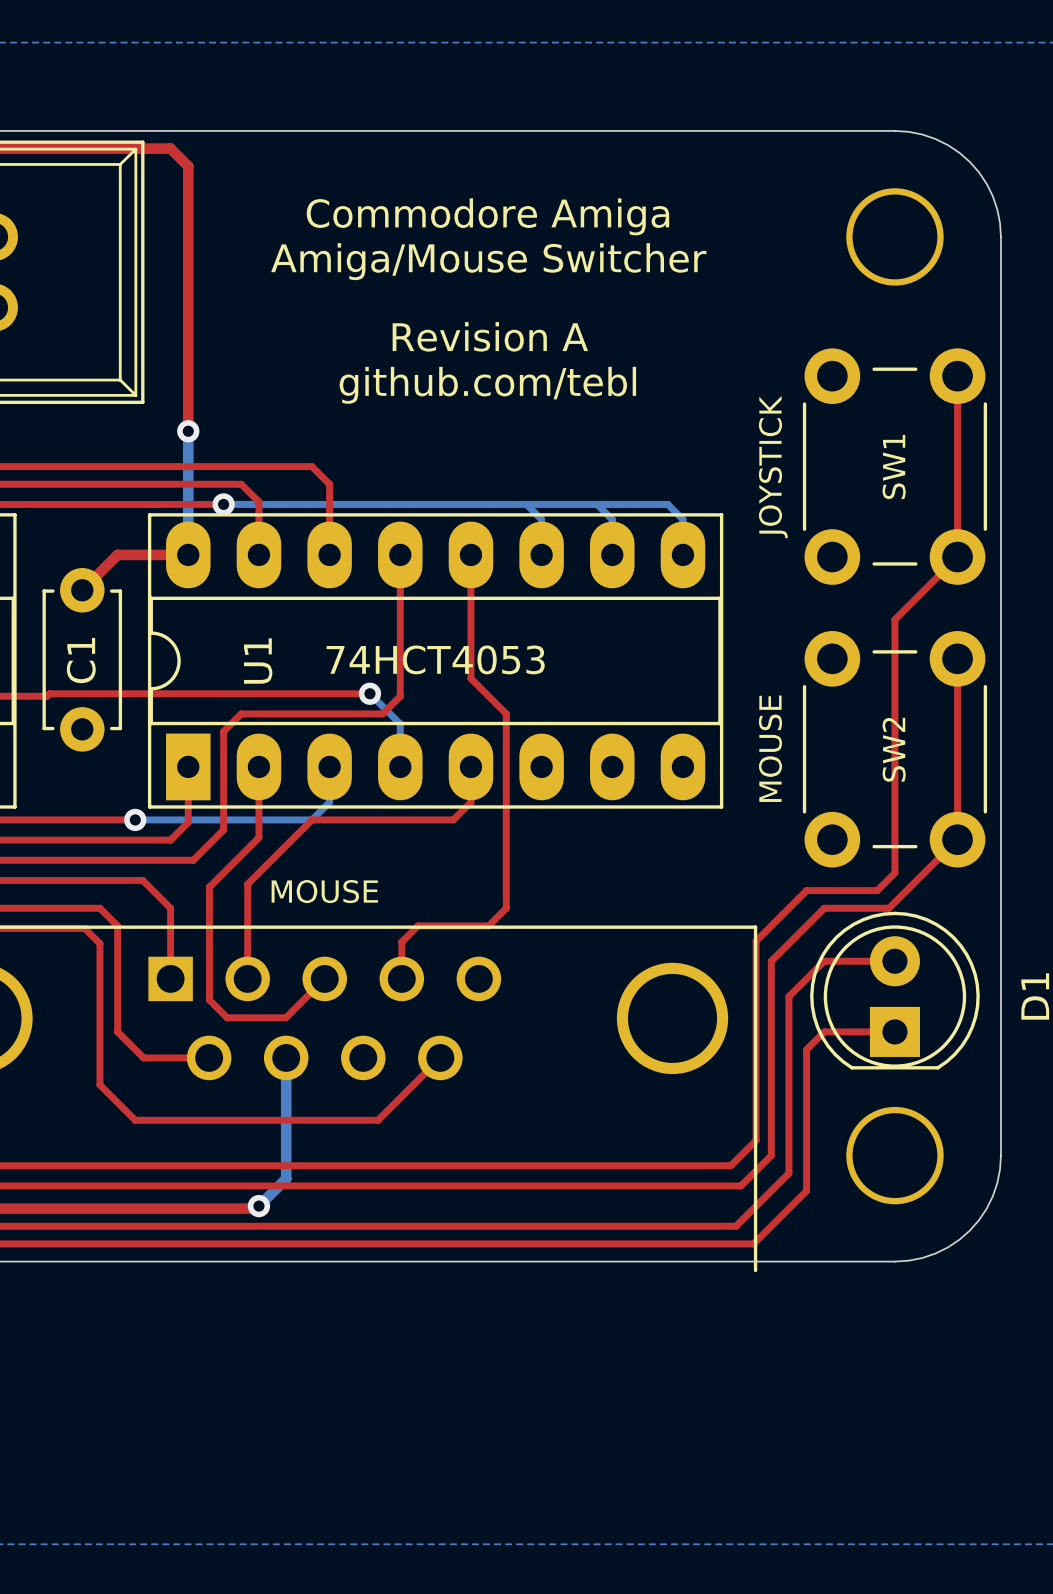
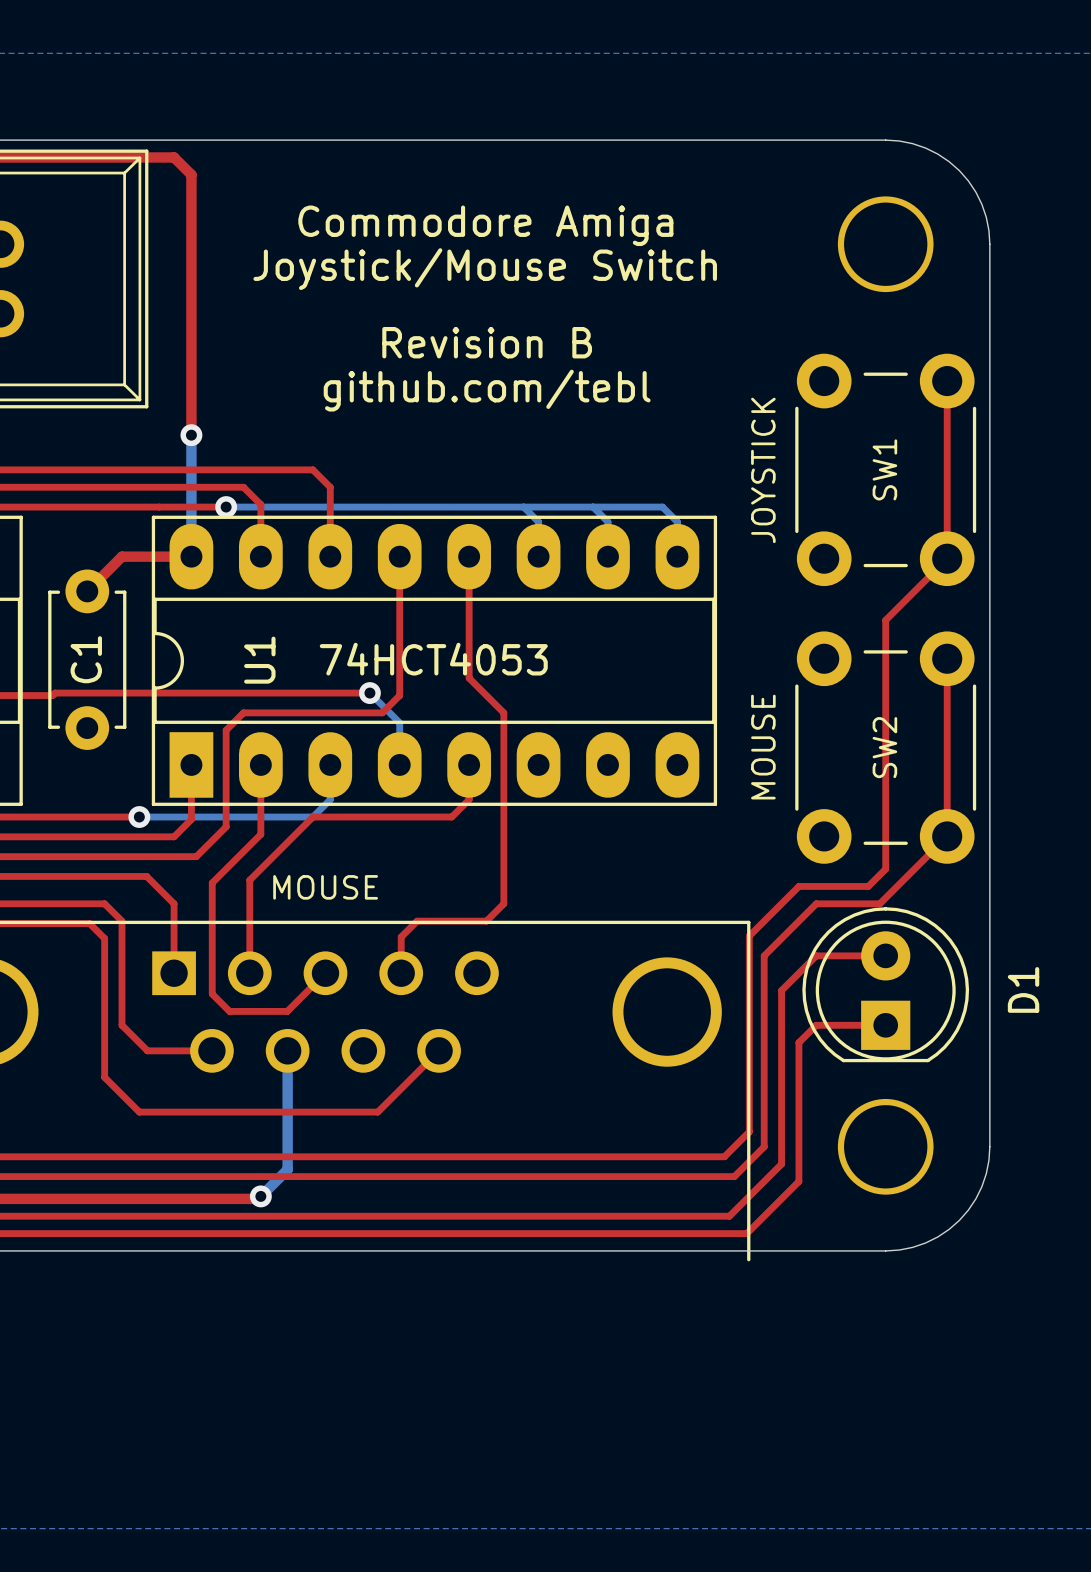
text: Amiga/Mouse Switcher (488, 261) -> Joystick/Mouse Switch (485, 269)
text: Revision A (490, 336) -> Revision B (487, 342)

